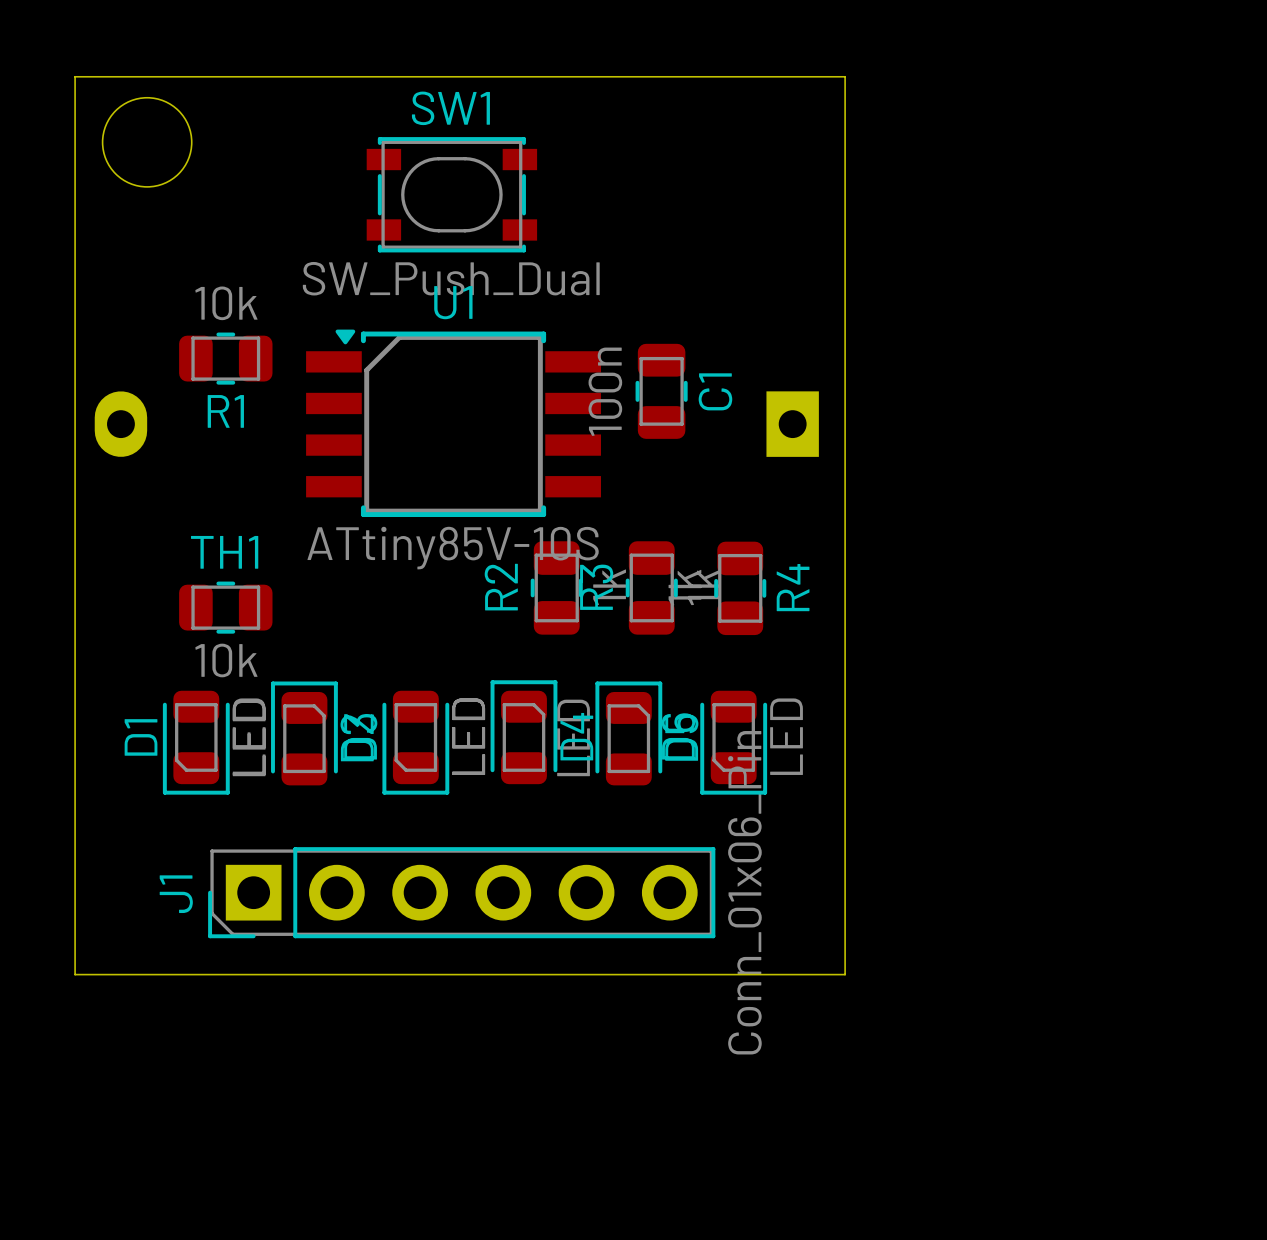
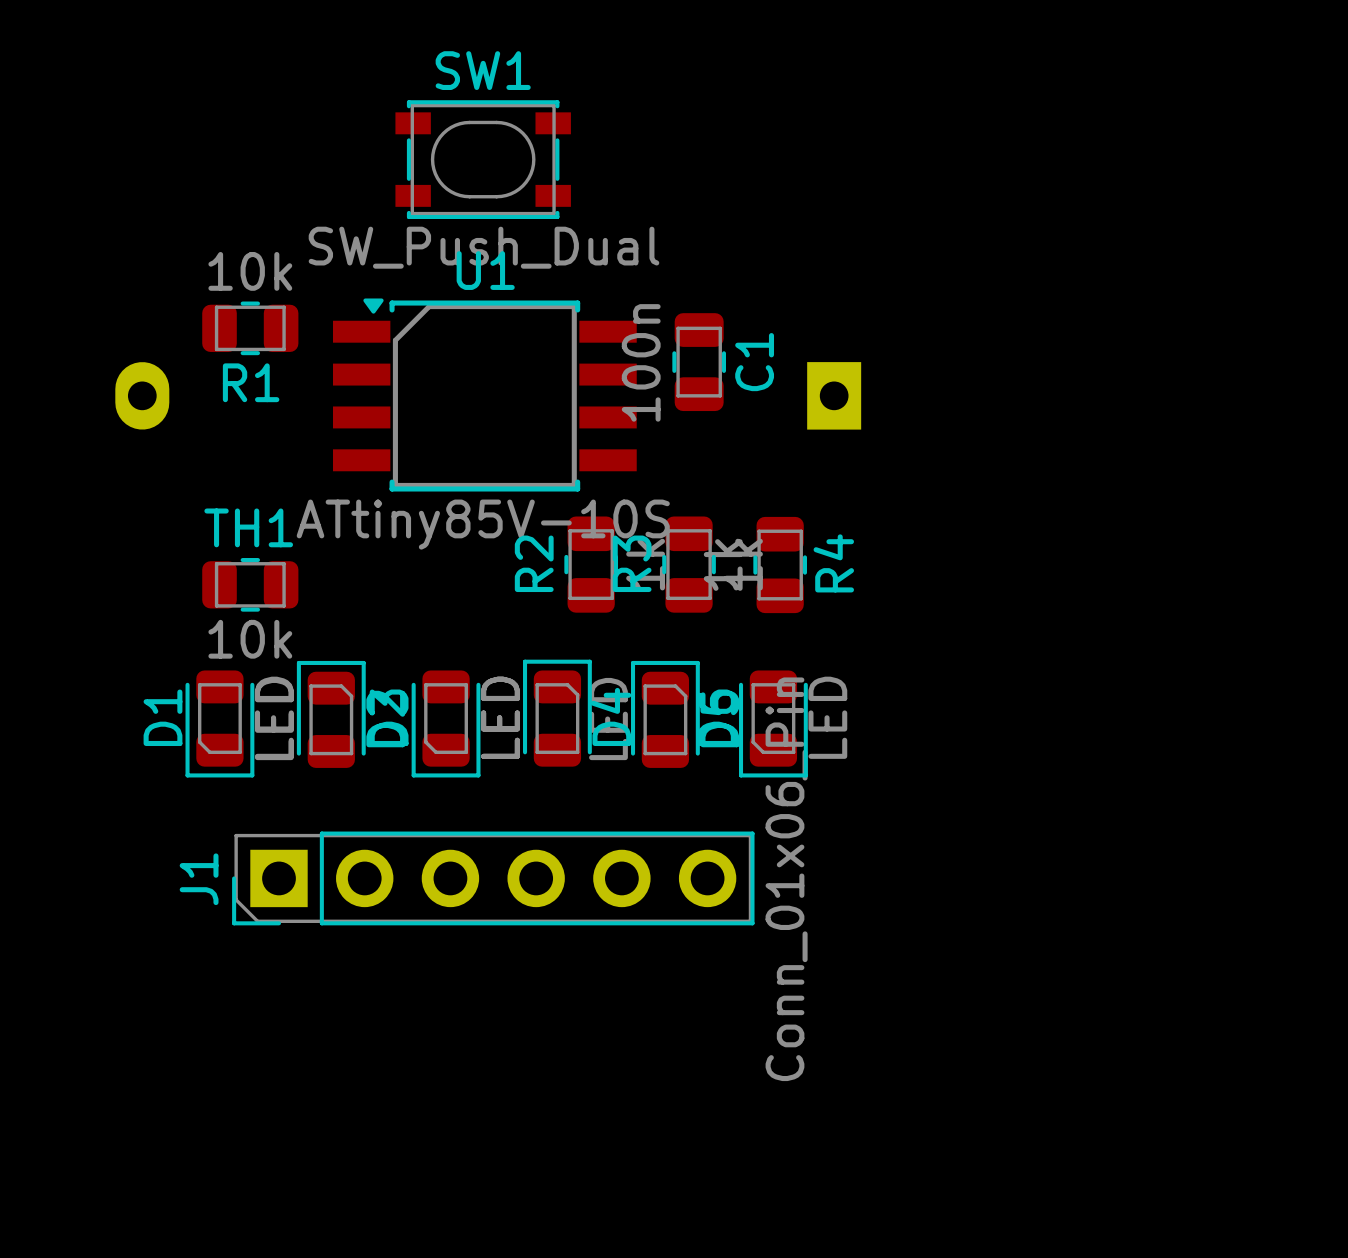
board edge: (75, 76) (845, 76) (845, 974) (75, 974) (75, 76) -> none
round board edge: [101, 96, 193, 188] -> none

